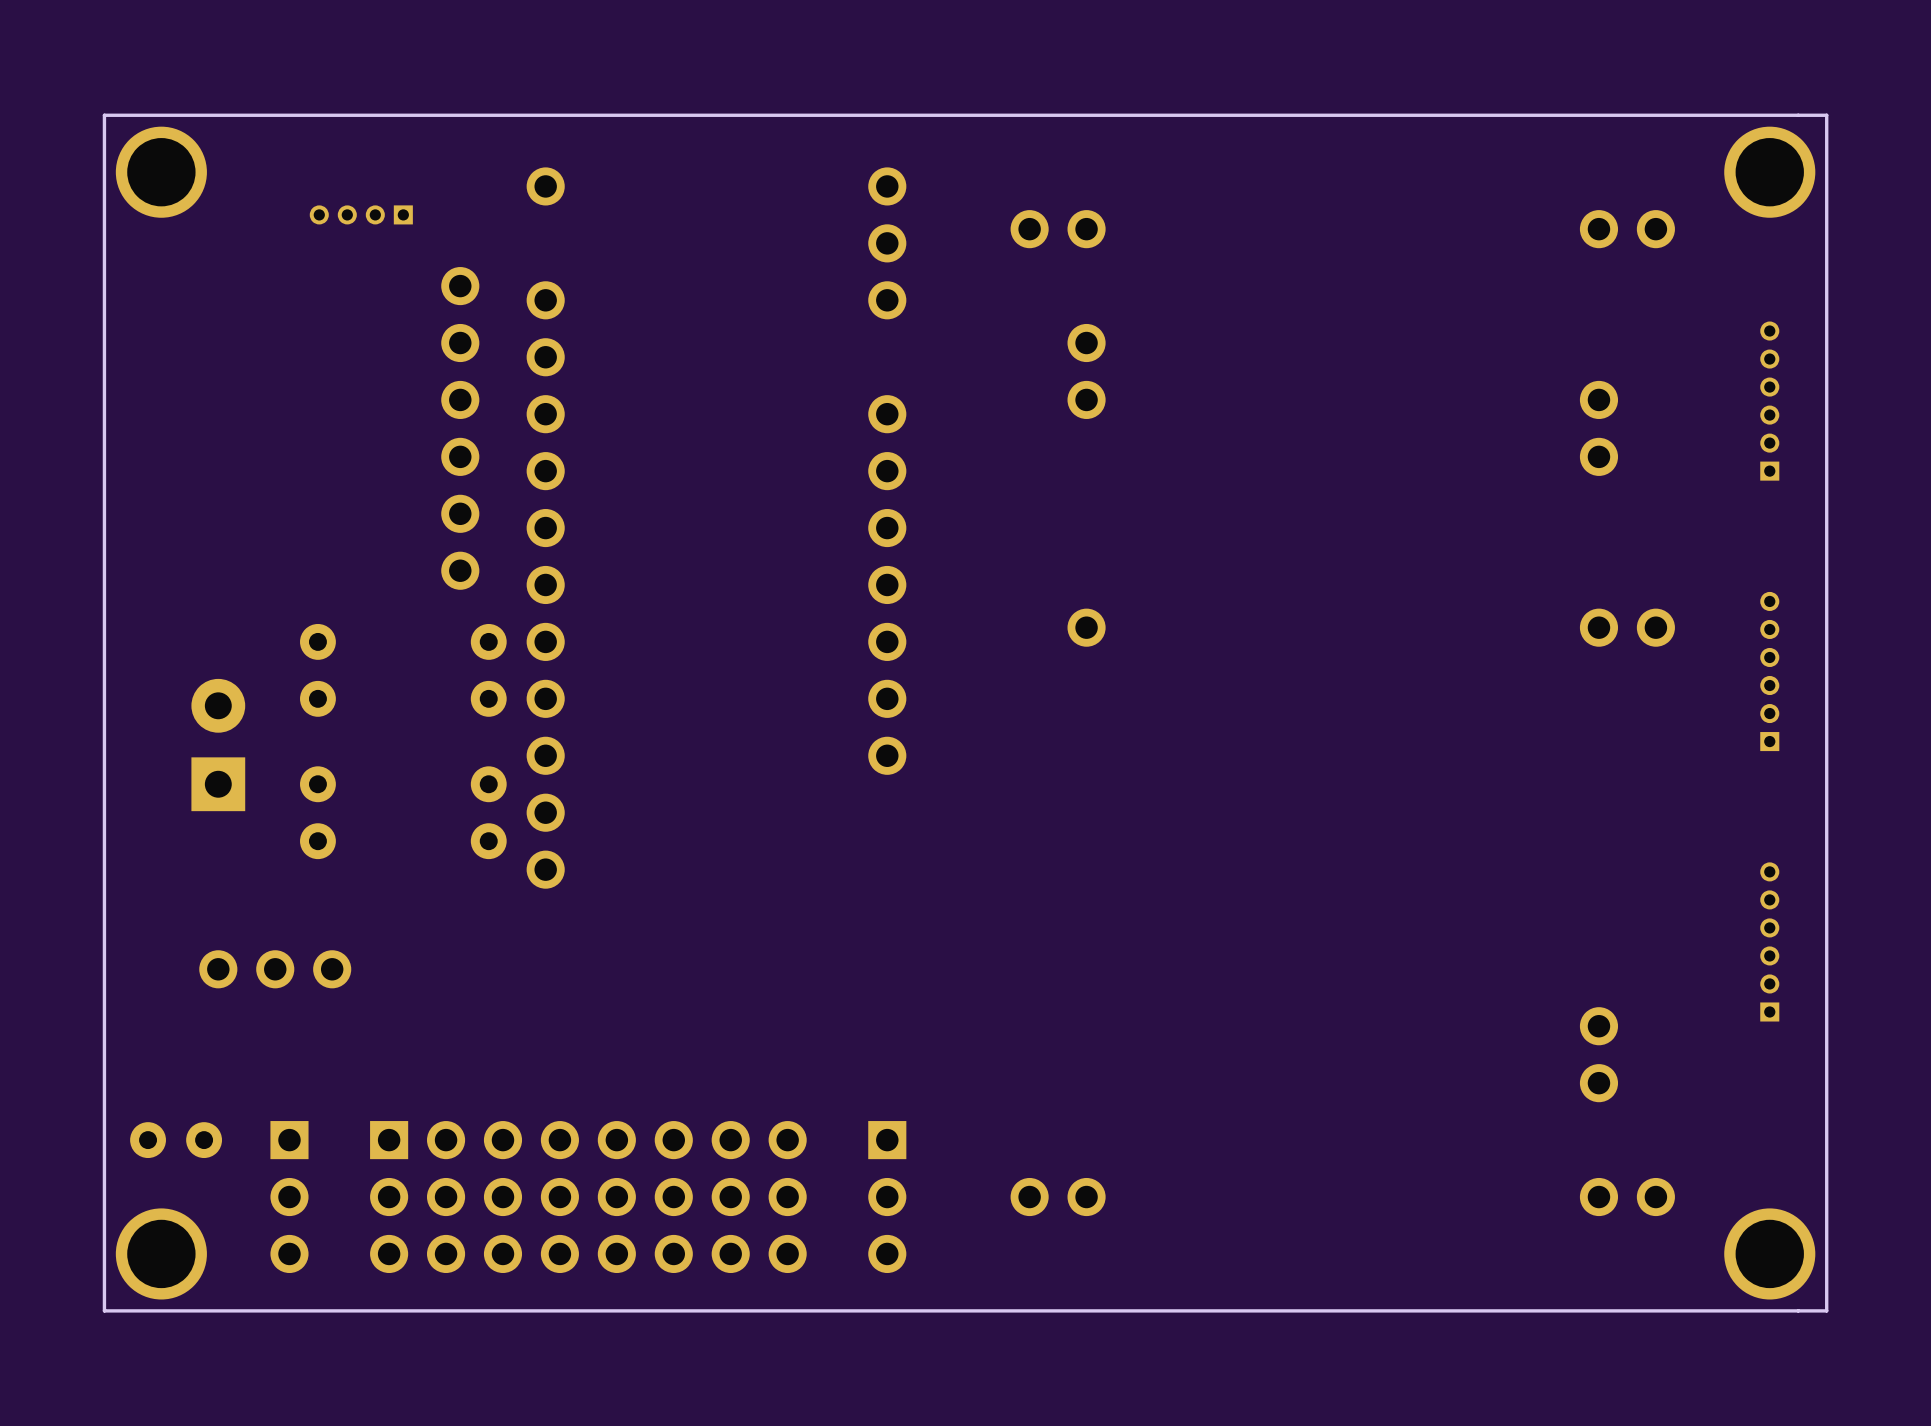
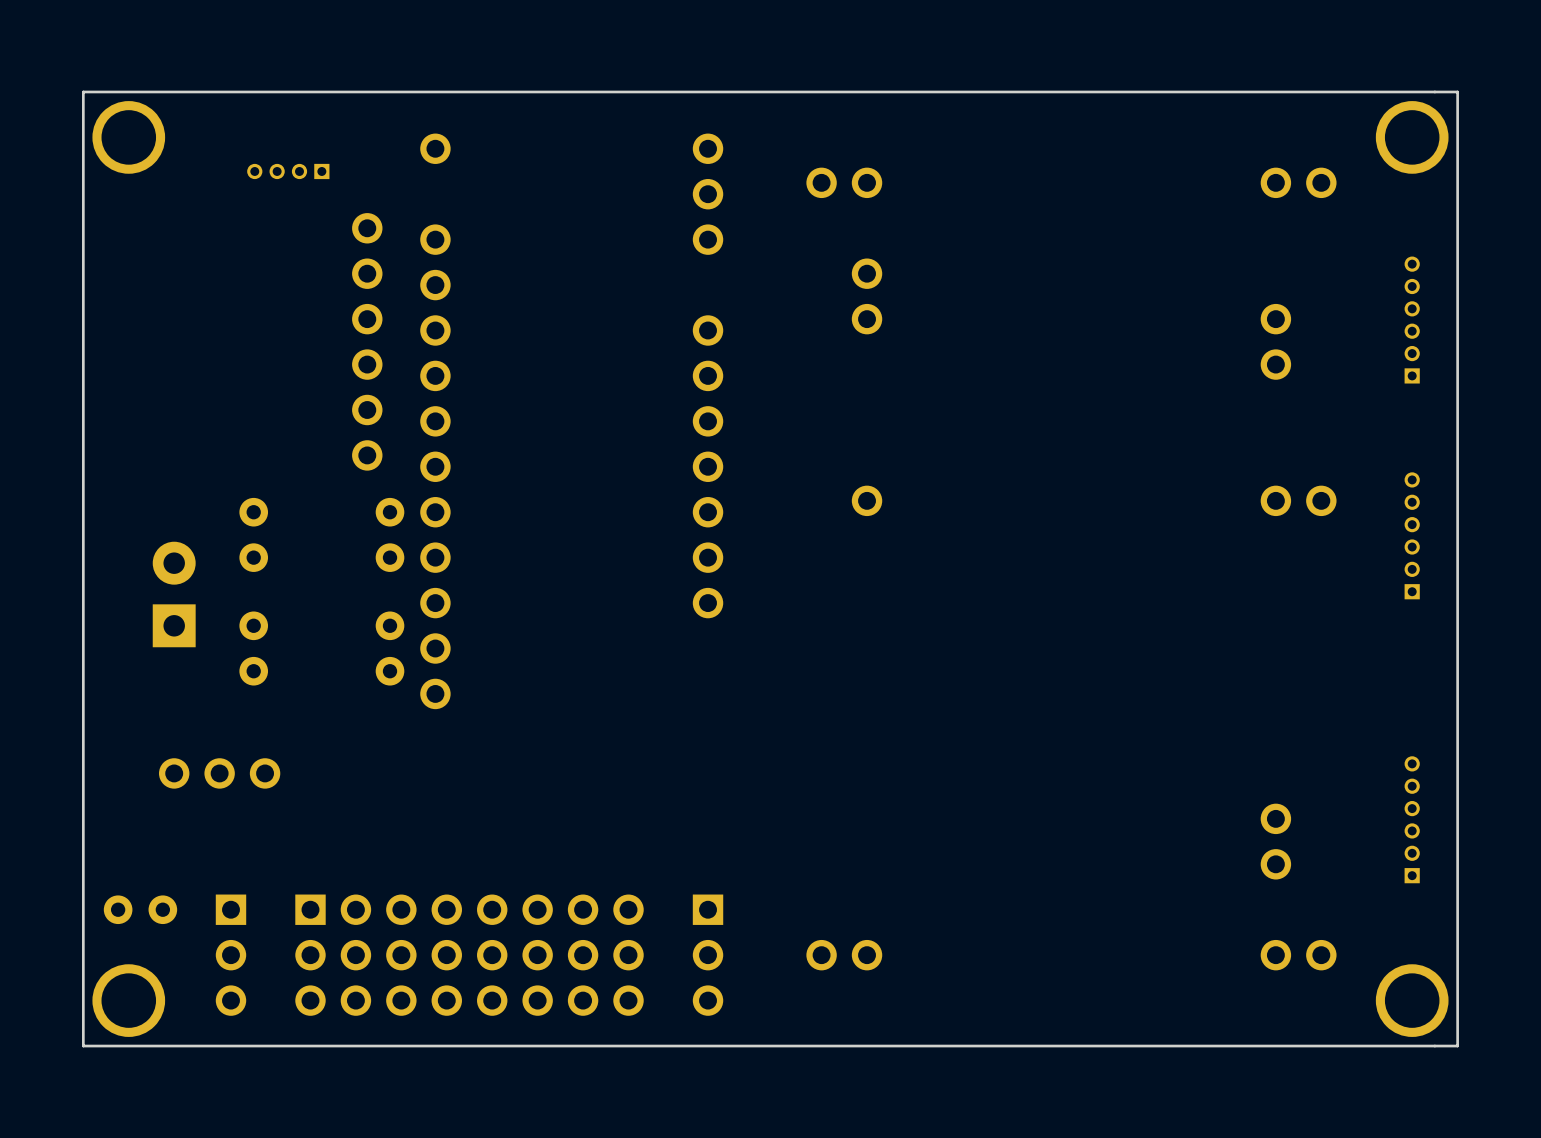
part position: (1769, 941) -> (1412, 819)

